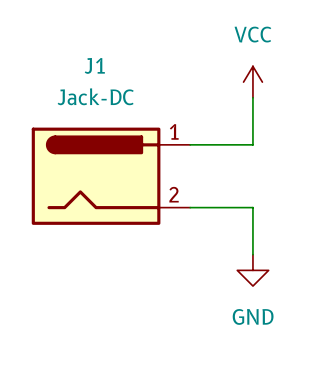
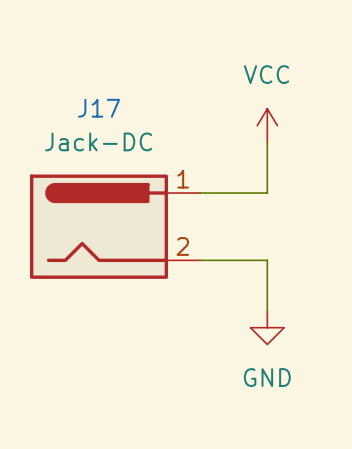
J1 name: J1 (94, 65) -> J17 (99, 108)

